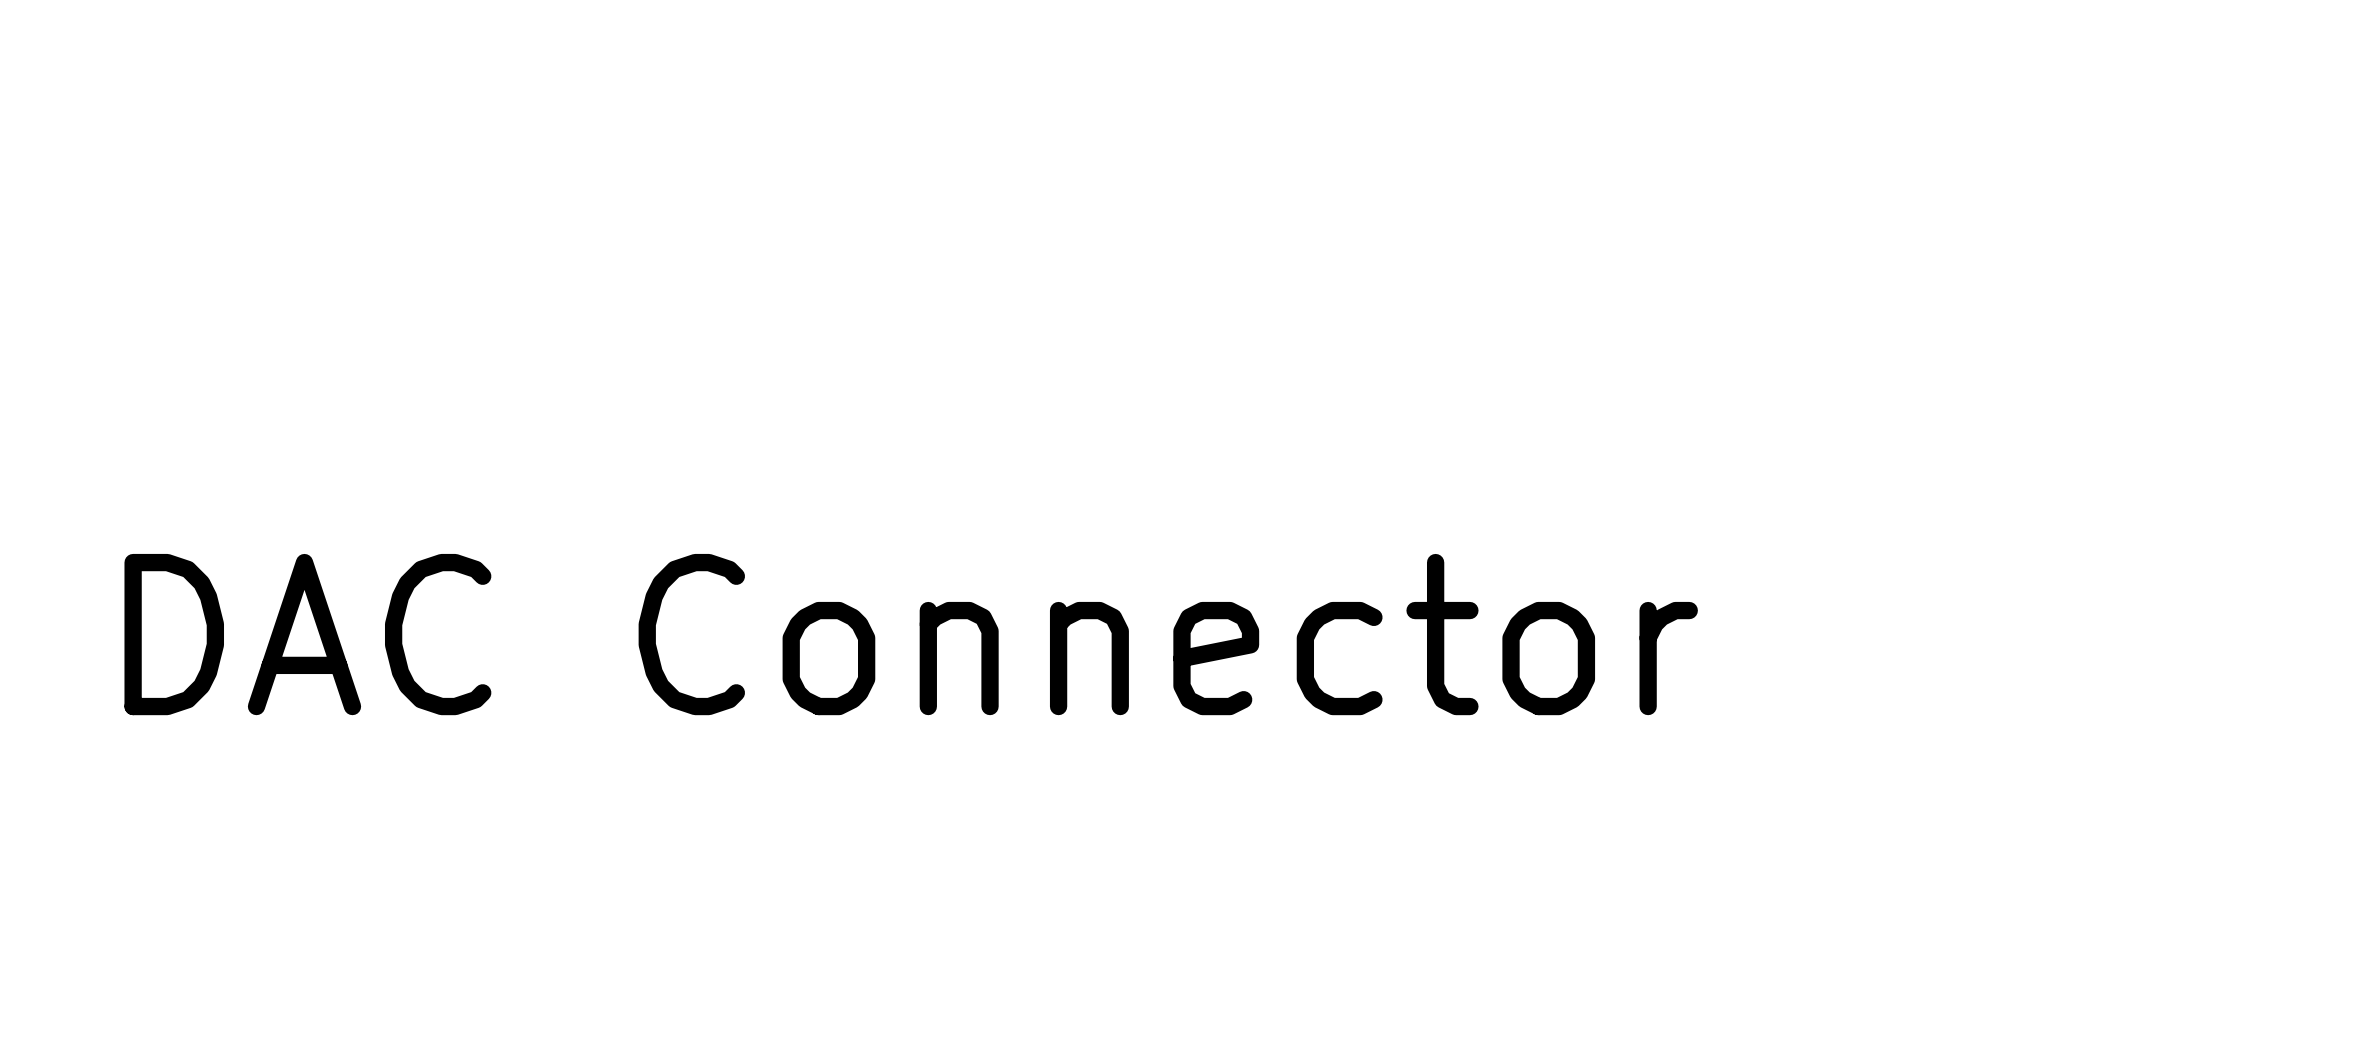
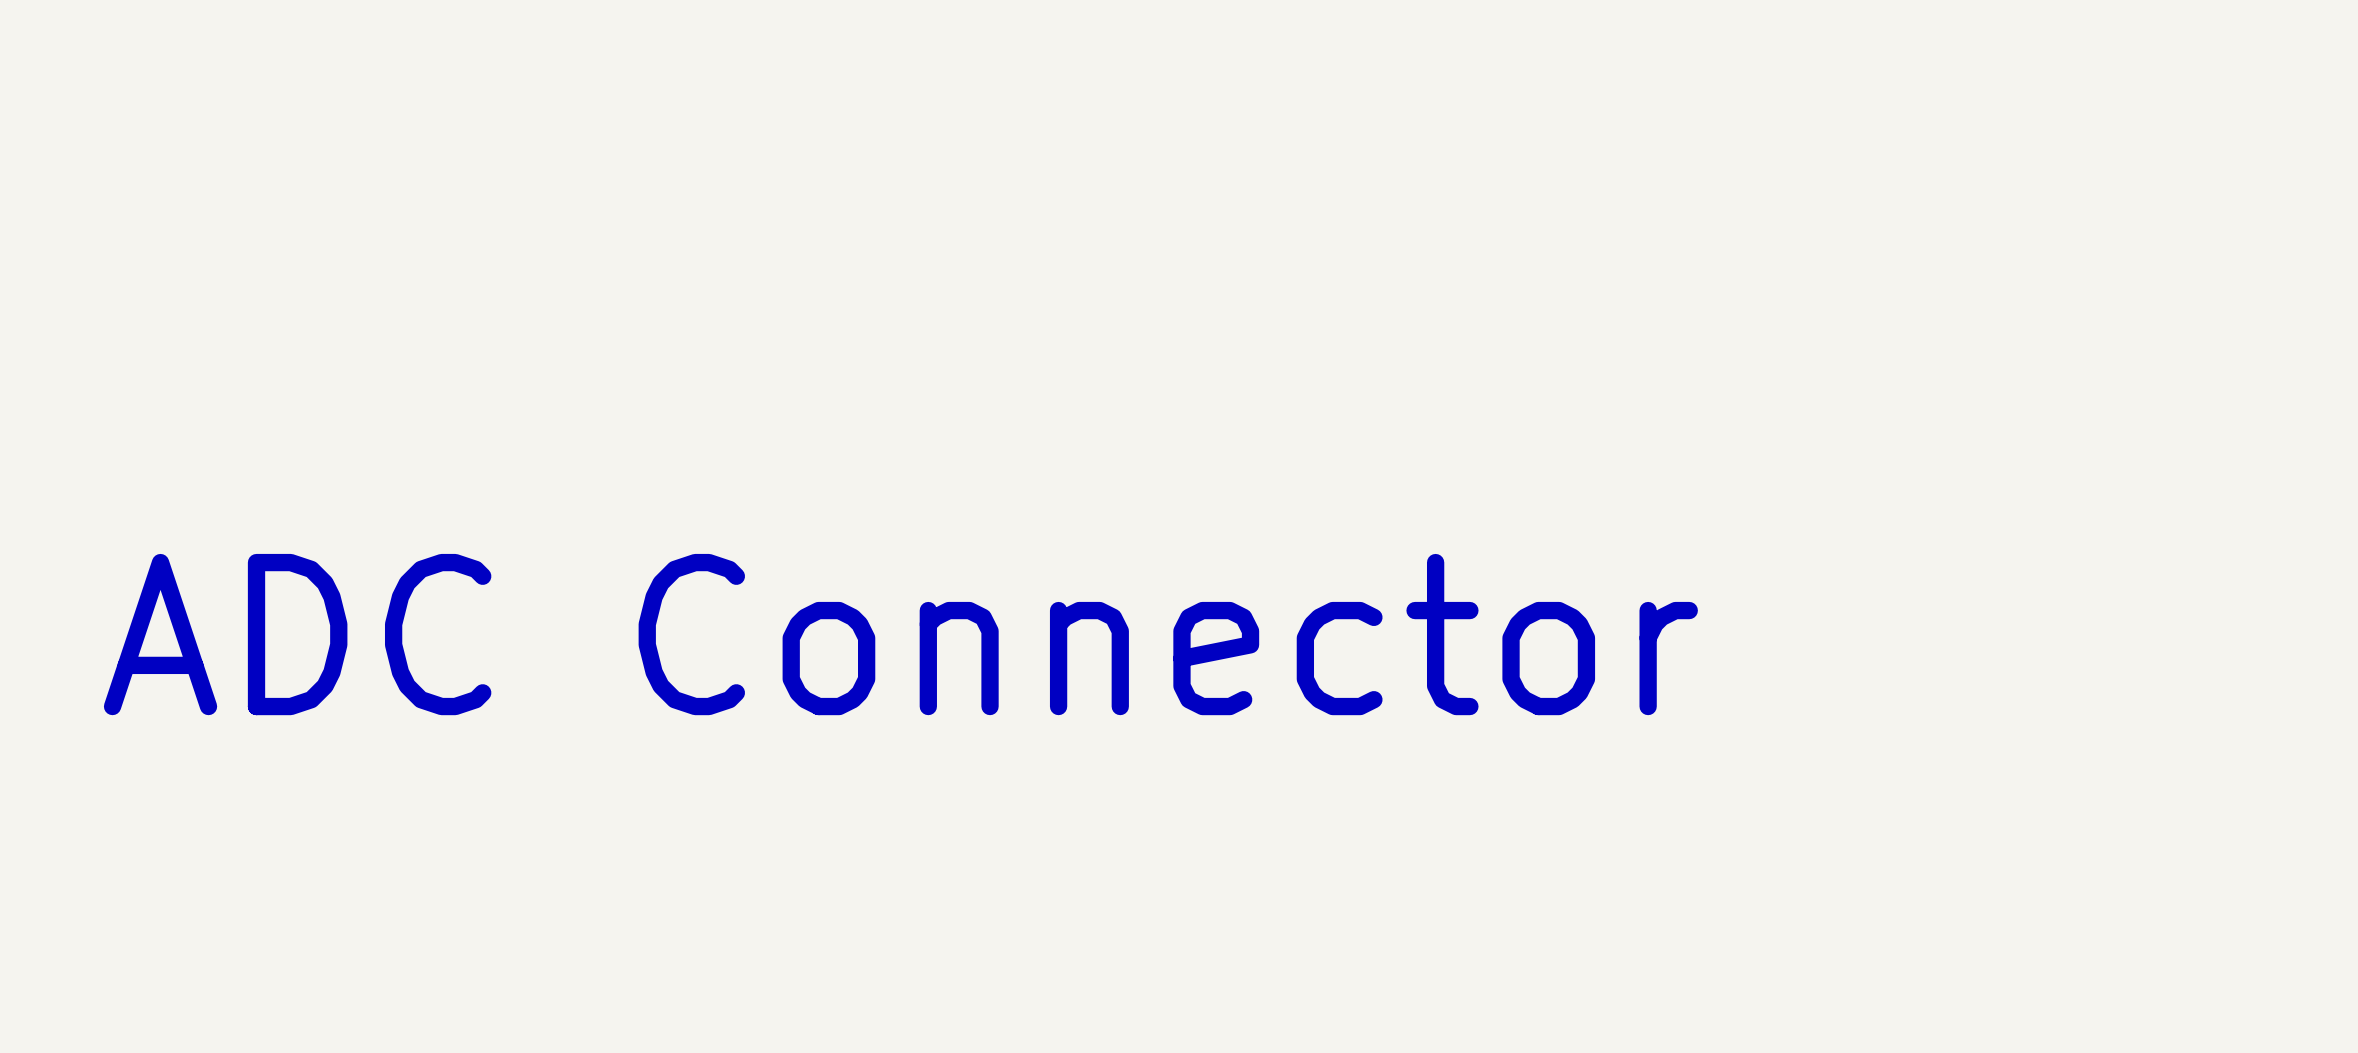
text: DAC Connector (911, 634) -> ADC Connector (900, 634)

